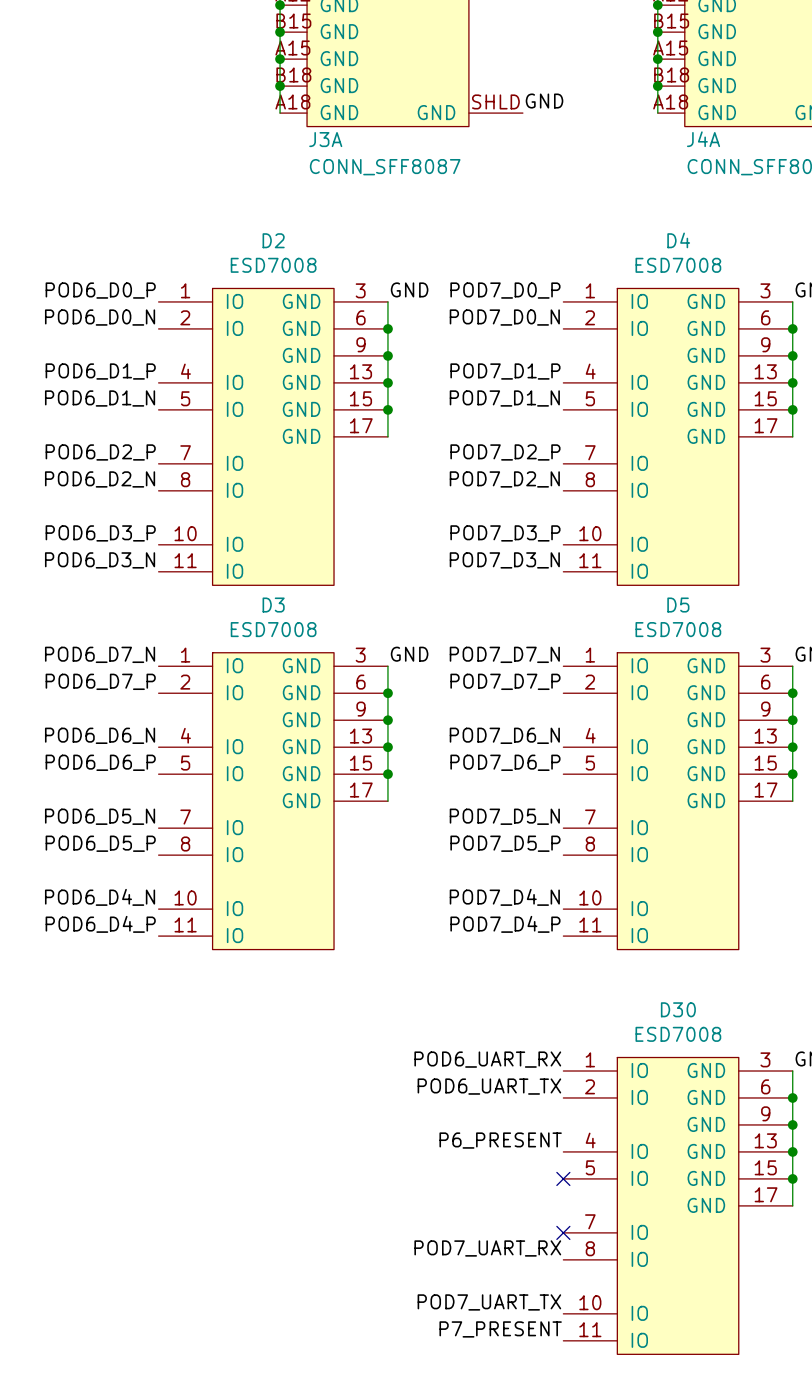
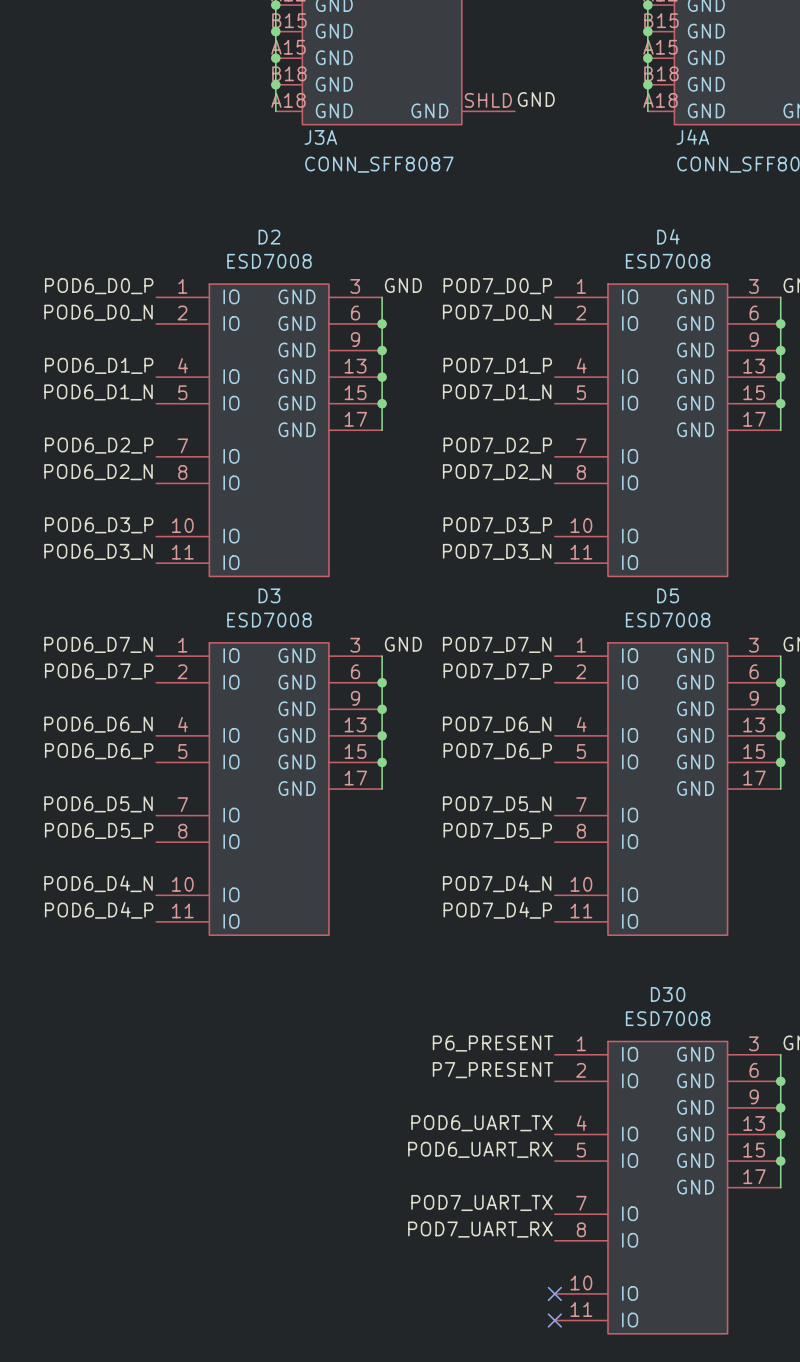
label: POD6_UART_RX (487, 1059) -> P6_PRESENT (493, 1043)
label: POD6_UART_TX (489, 1086) -> P7_PRESENT (493, 1070)
label: P6_PRESENT (500, 1140) -> POD6_UART_TX (481, 1123)
label: none -> POD6_UART_RX (480, 1149)
no-connect mark: (563, 1178) -> none
no-connect mark: (563, 1232) -> none
label position: POD7_UART_TX (489, 1302) -> POD7_UART_TX (481, 1203)
no-connect mark: none -> (554, 1293)
label: P7_PRESENT (500, 1329) -> none
no-connect mark: none -> (554, 1320)

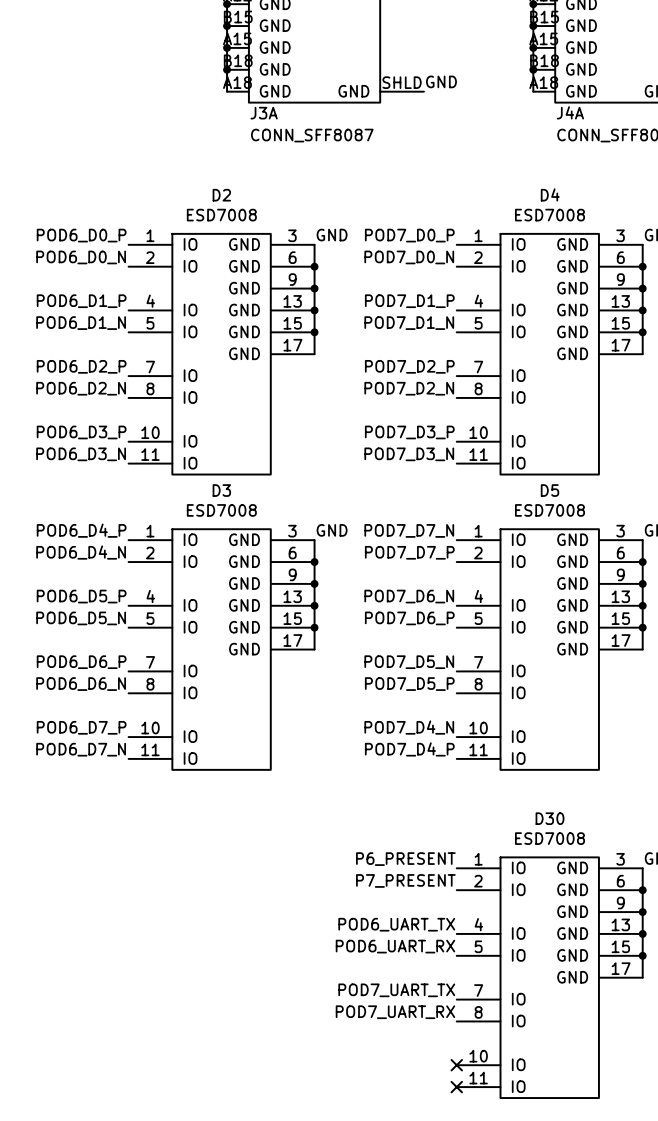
label: POD6_D7_N (98, 644) -> POD6_D4_P (81, 530)
label: POD6_D7_P (99, 671) -> POD6_D4_N (81, 552)
label: POD6_D6_N (98, 724) -> POD6_D5_P (81, 596)
label: POD6_D6_P (99, 751) -> POD6_D5_N (81, 618)
label: POD6_D5_N (98, 804) -> POD6_D6_P (81, 662)
label: POD6_D5_P (99, 830) -> POD6_D6_N (81, 684)
label: POD6_D4_N (98, 883) -> POD6_D7_P (81, 727)
label: POD6_D4_P (99, 910) -> POD6_D7_N (81, 749)

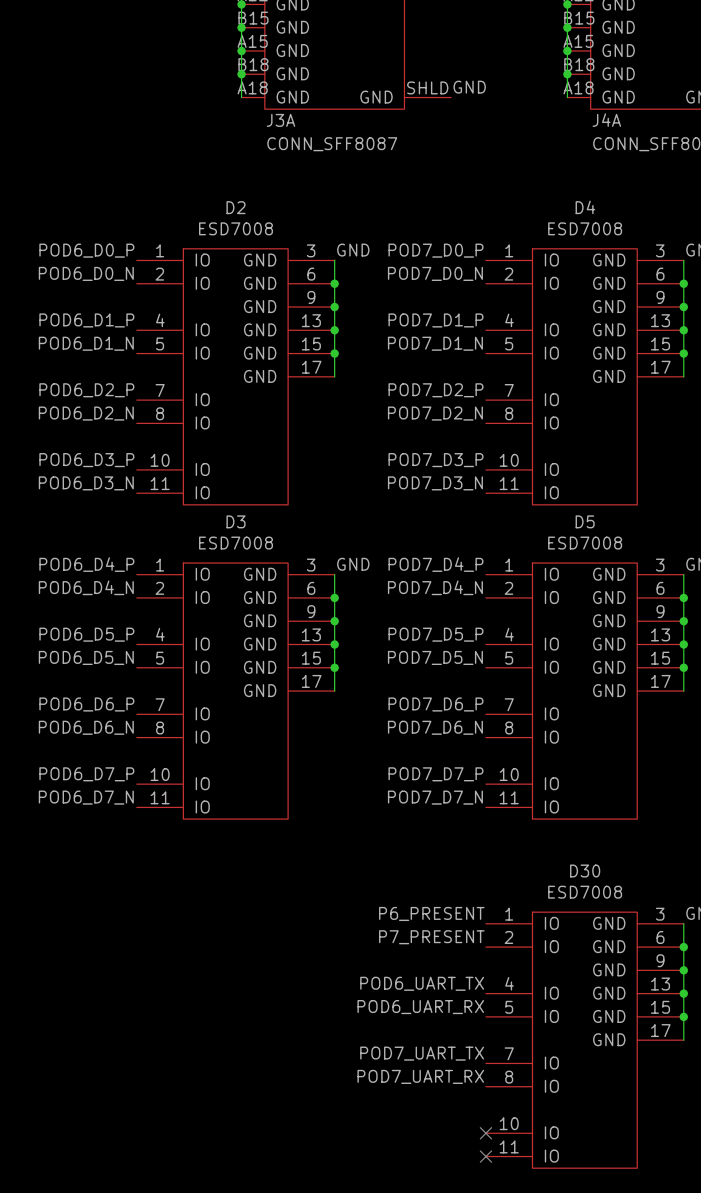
label: POD7_D7_N (409, 530) -> POD7_D4_P (435, 564)
label: POD7_D7_P (409, 552) -> POD7_D4_N (435, 587)
label: POD7_D6_N (409, 596) -> POD7_D5_P (435, 634)
label: POD7_D6_P (409, 618) -> POD7_D5_N (435, 657)
label: POD7_D5_N (409, 662) -> POD7_D6_P (435, 704)
label: POD7_D5_P (409, 684) -> POD7_D6_N (435, 727)
label: POD7_D4_N (409, 727) -> POD7_D7_P (435, 774)
label: POD7_D4_P (409, 749) -> POD7_D7_N (435, 797)

